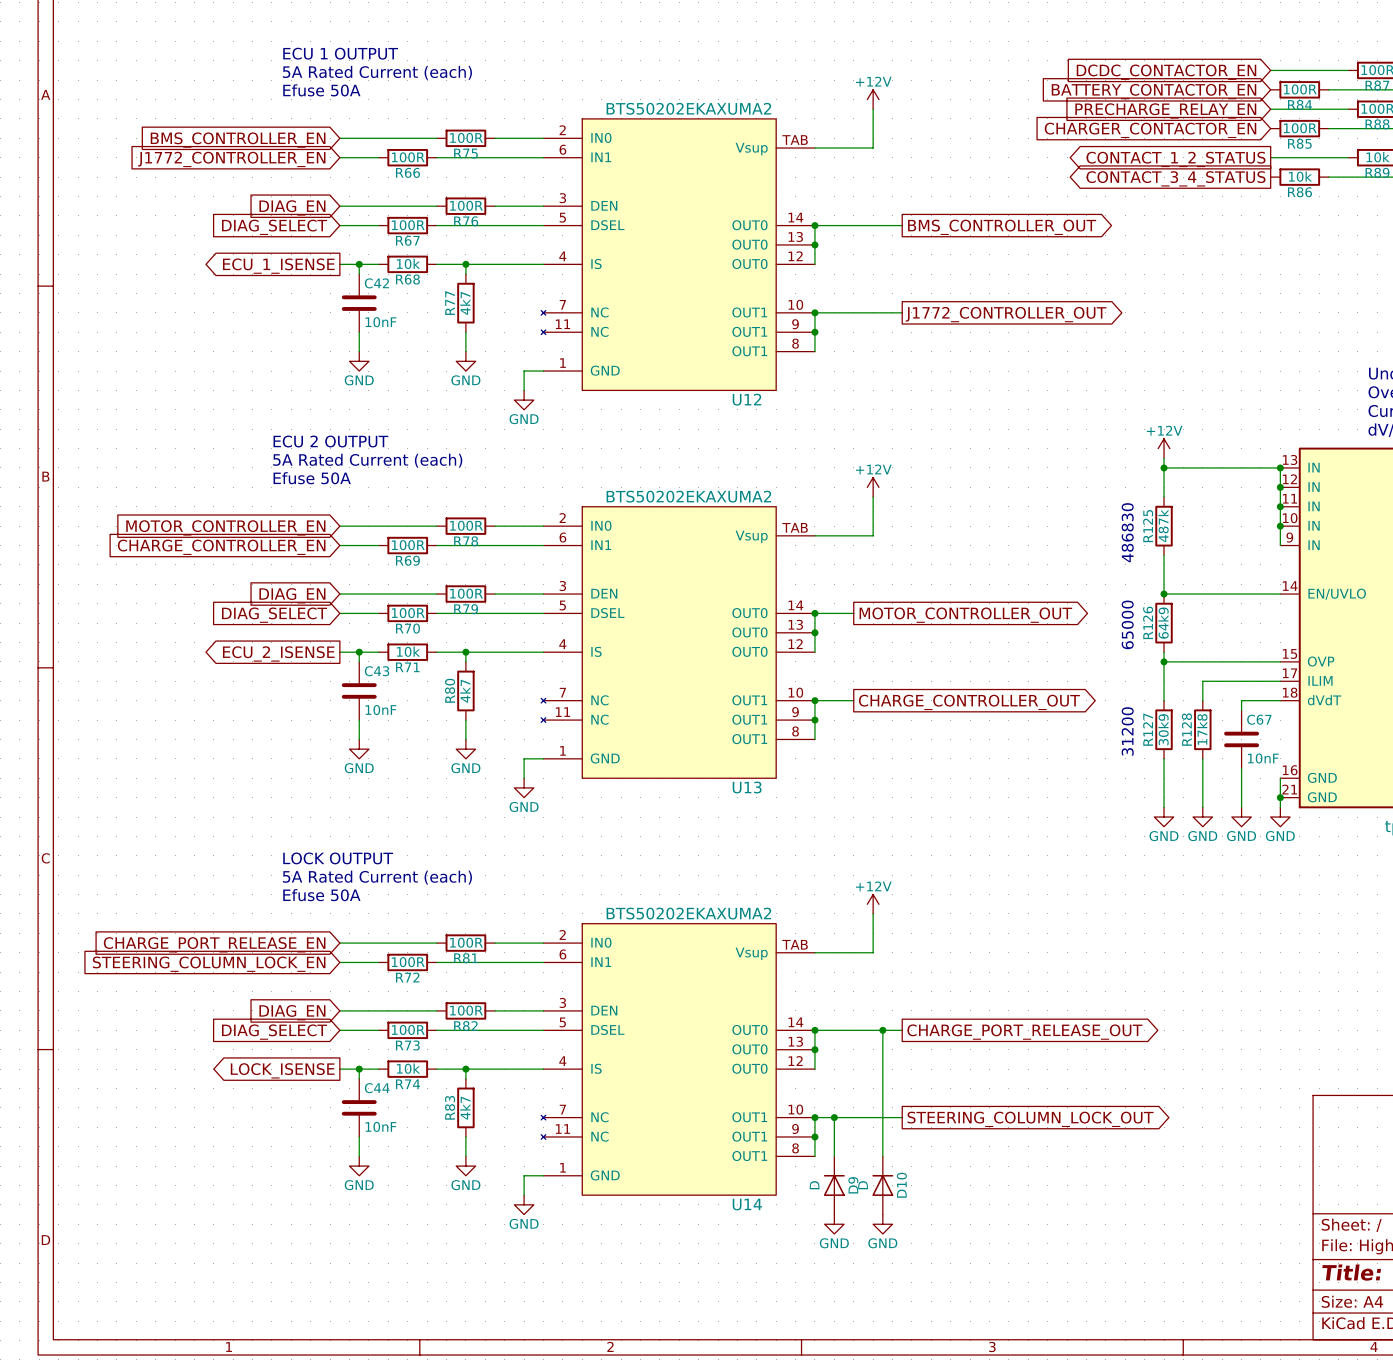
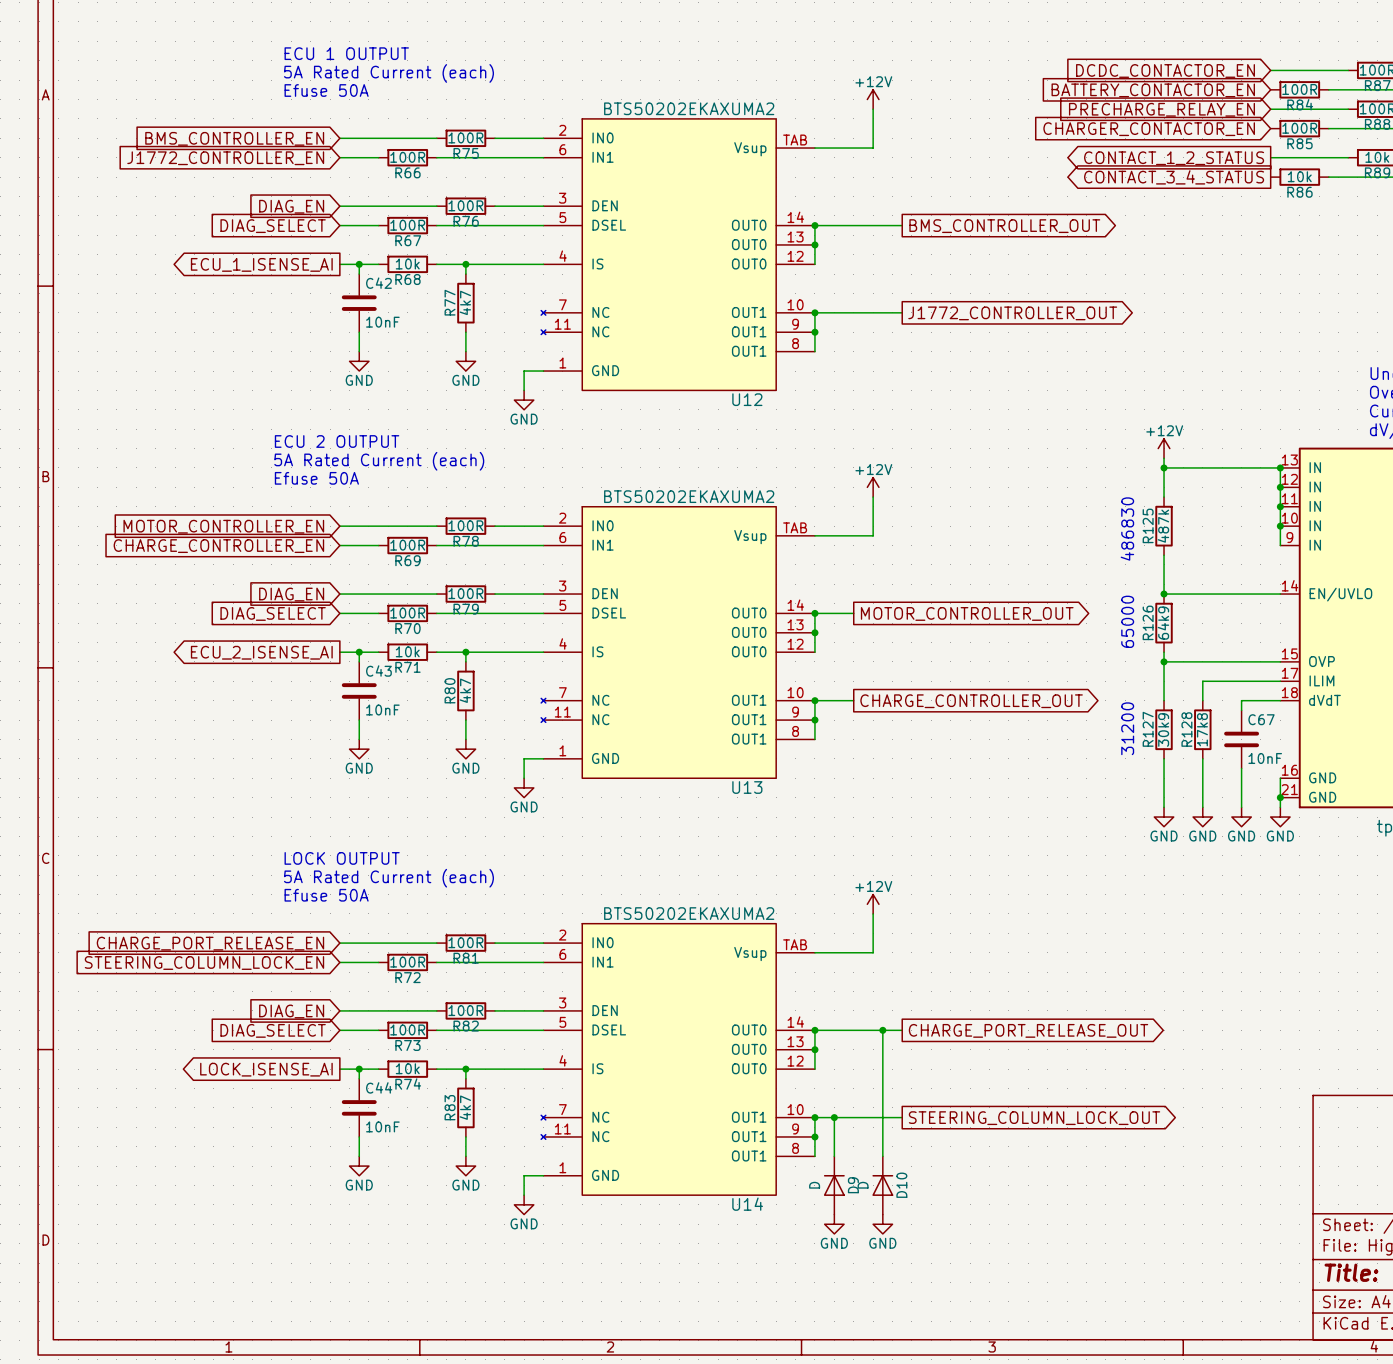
global label: ECU_1_ISENSE (278, 266) -> ECU_1_ISENSE_AI (261, 264)
global label: ECU_2_ISENSE (278, 653) -> ECU_2_ISENSE_AI (261, 652)
global label: LOCK_ISENSE (282, 1070) -> LOCK_ISENSE_AI (266, 1069)

